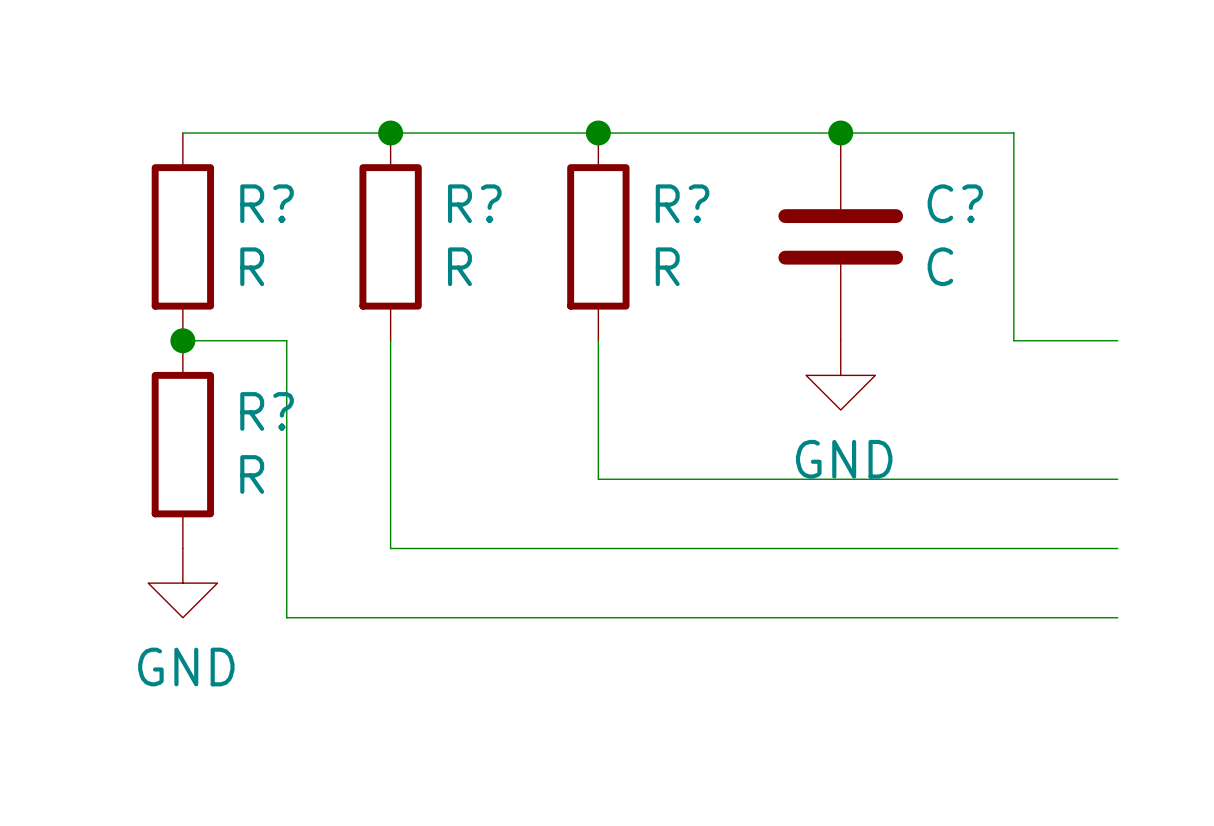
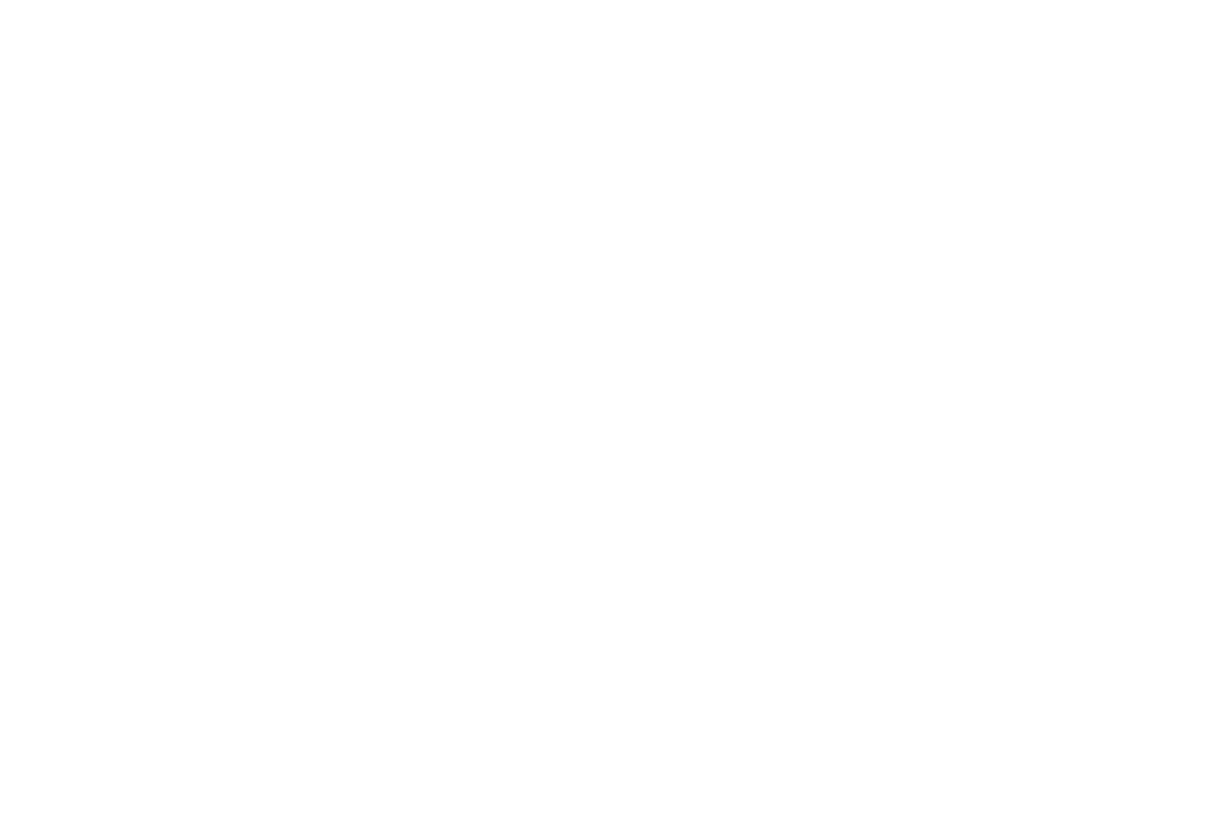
wire: (182, 133) (1013, 133) (1013, 340) (1117, 340) -> none
junction: (390, 133) -> none
junction: (598, 133) -> none
junction: (840, 133) -> none
R?: R (182, 236) -> none
R?: R (390, 236) -> none
R?: R (598, 236) -> none
C?: C (840, 236) -> none
wire: (182, 340) (286, 340) (286, 617) (1117, 617) -> none
junction: (182, 340) -> none
wire: (390, 340) (390, 548) (1117, 548) -> none
wire: (598, 340) (598, 479) (1117, 479) -> none
power symbol: GND (840, 375) -> none
R?: R (182, 444) -> none
power symbol: GND (182, 583) -> none

